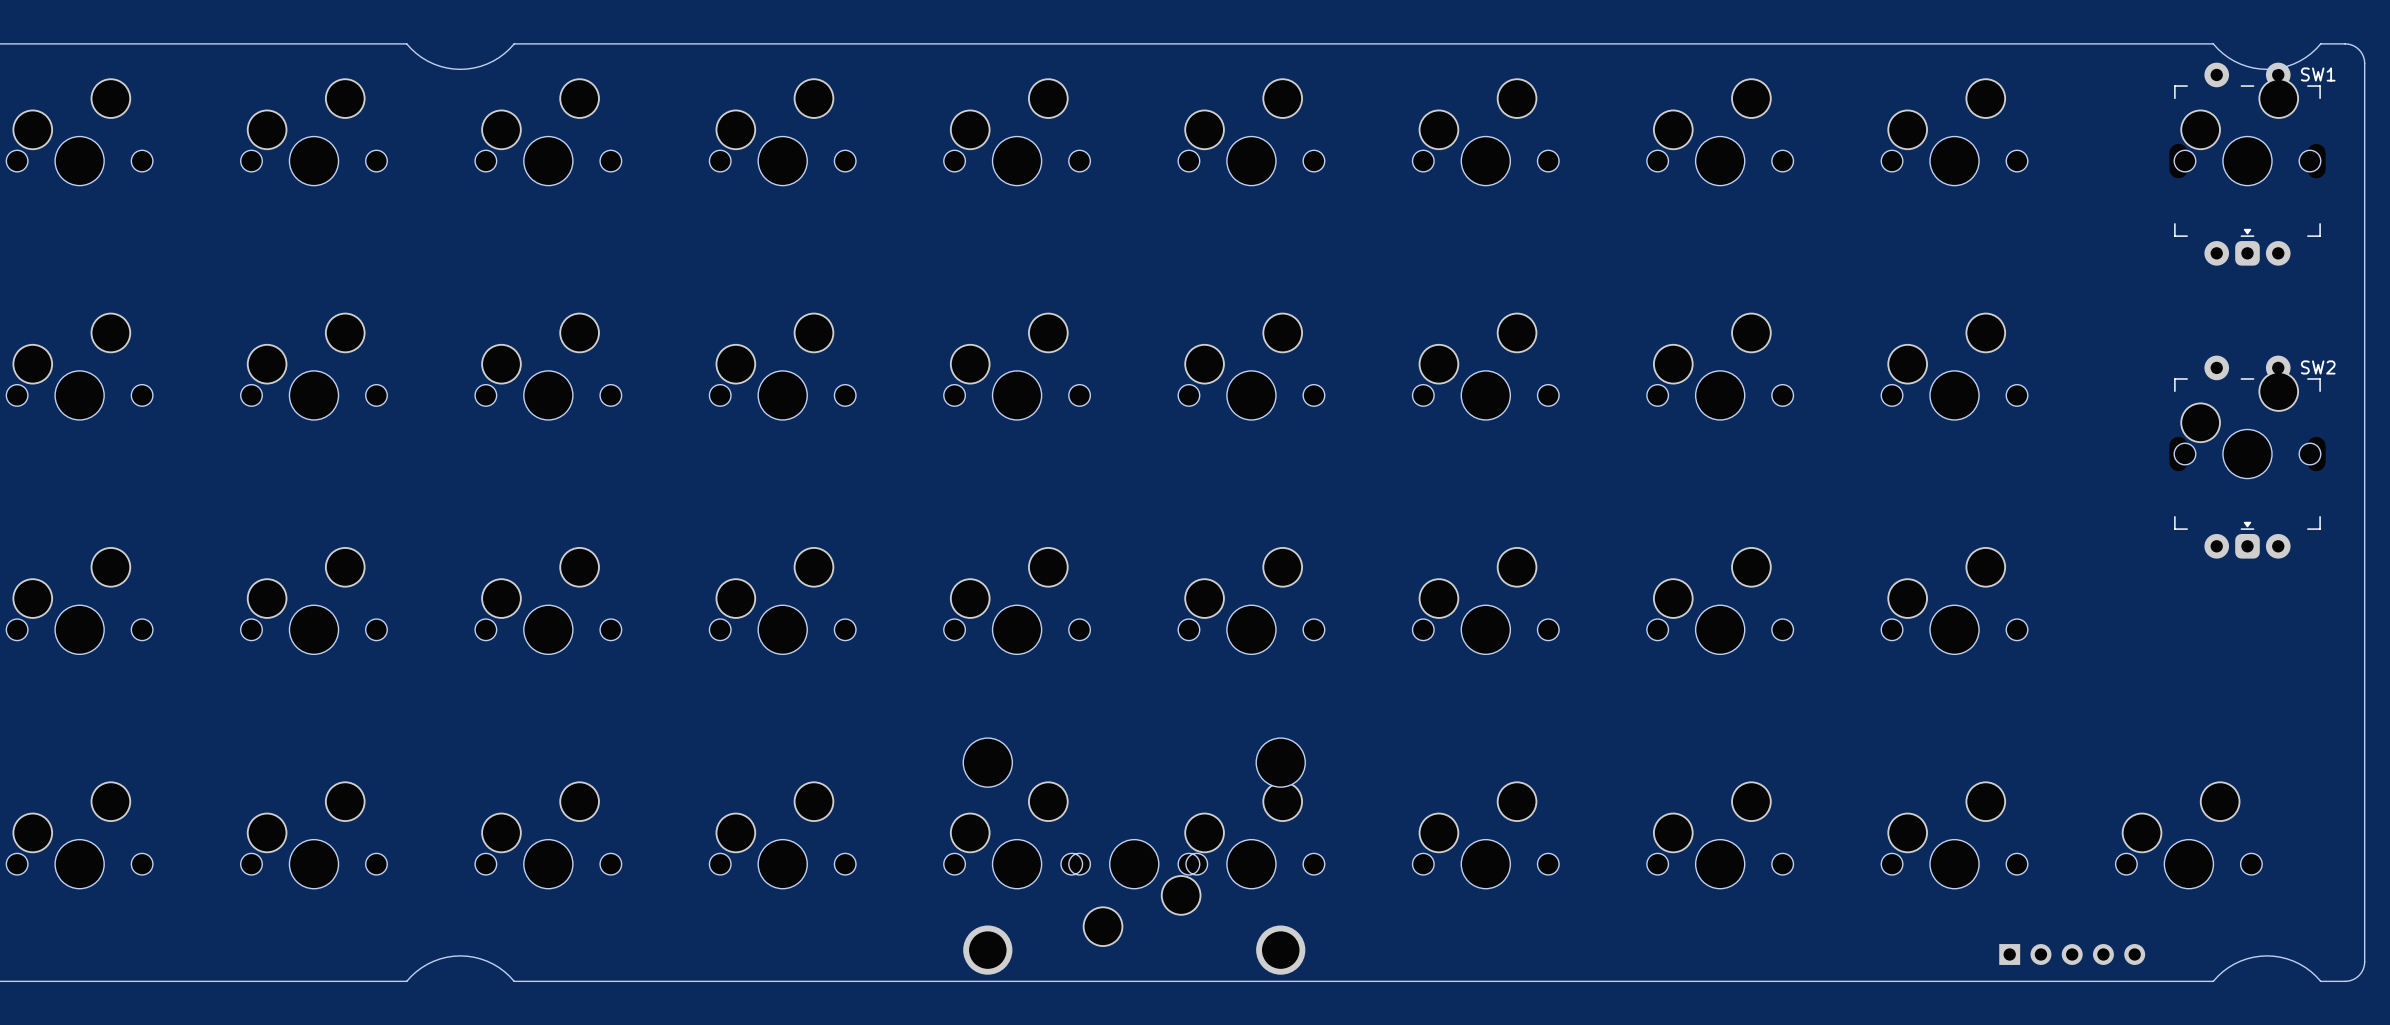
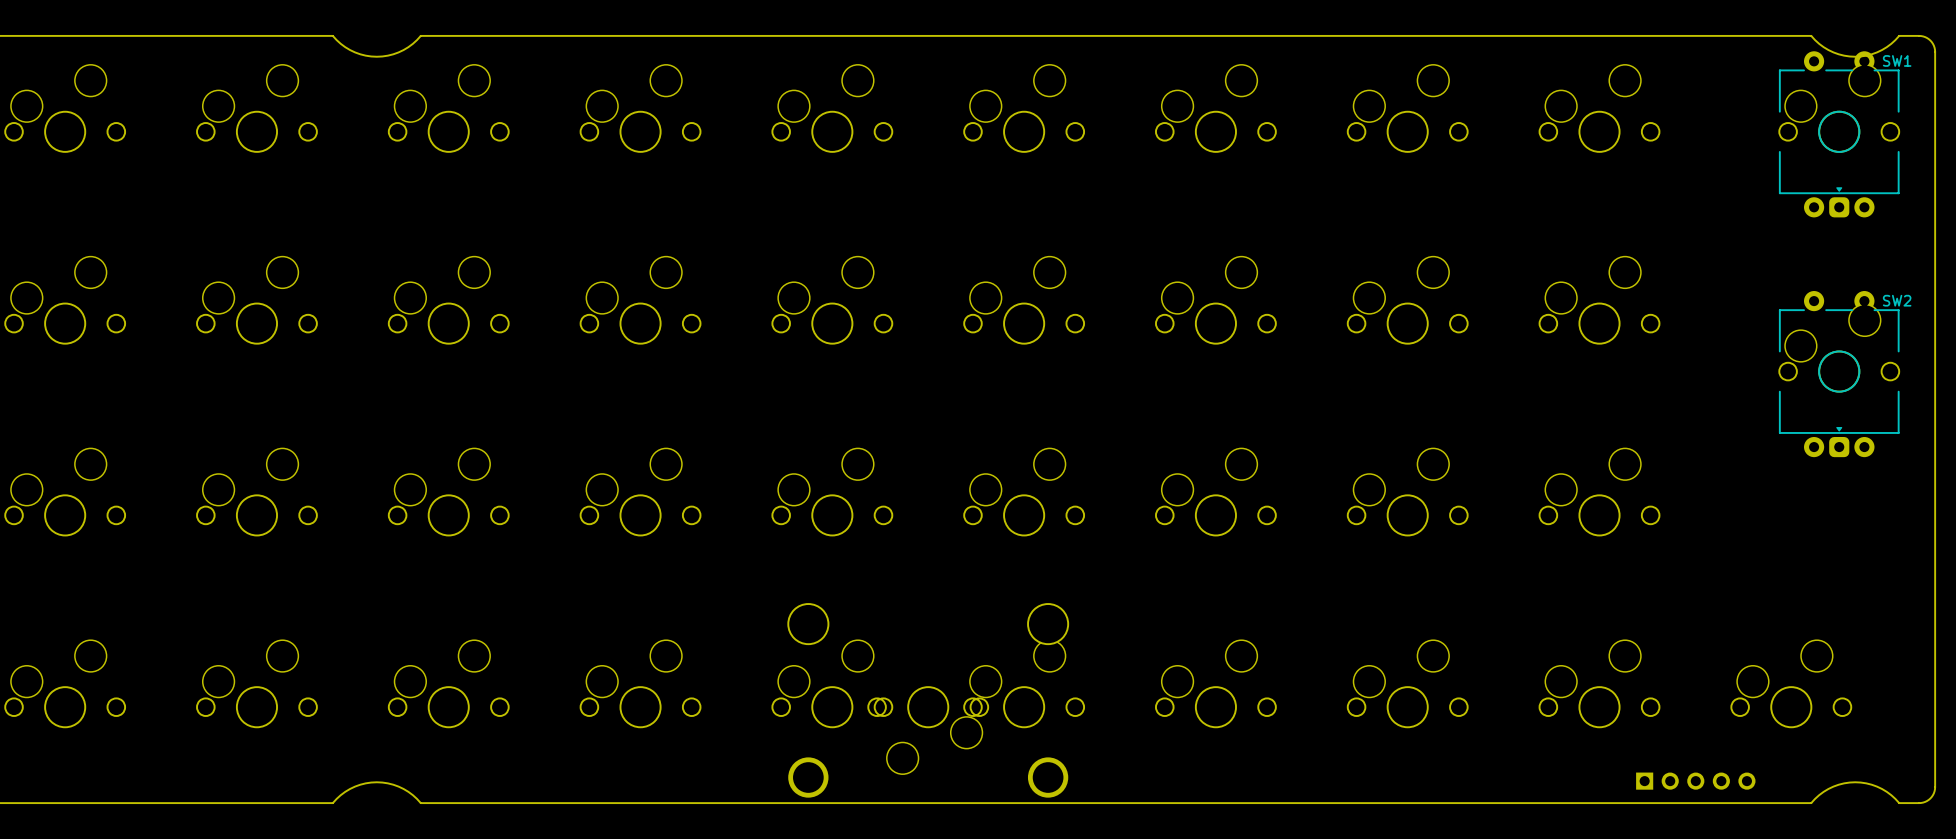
SW1 footprint: [2169, 62, 2326, 266] -> [1775, 51, 1904, 218]
SW2 footprint: [2169, 355, 2326, 559] -> [1775, 291, 1904, 458]

